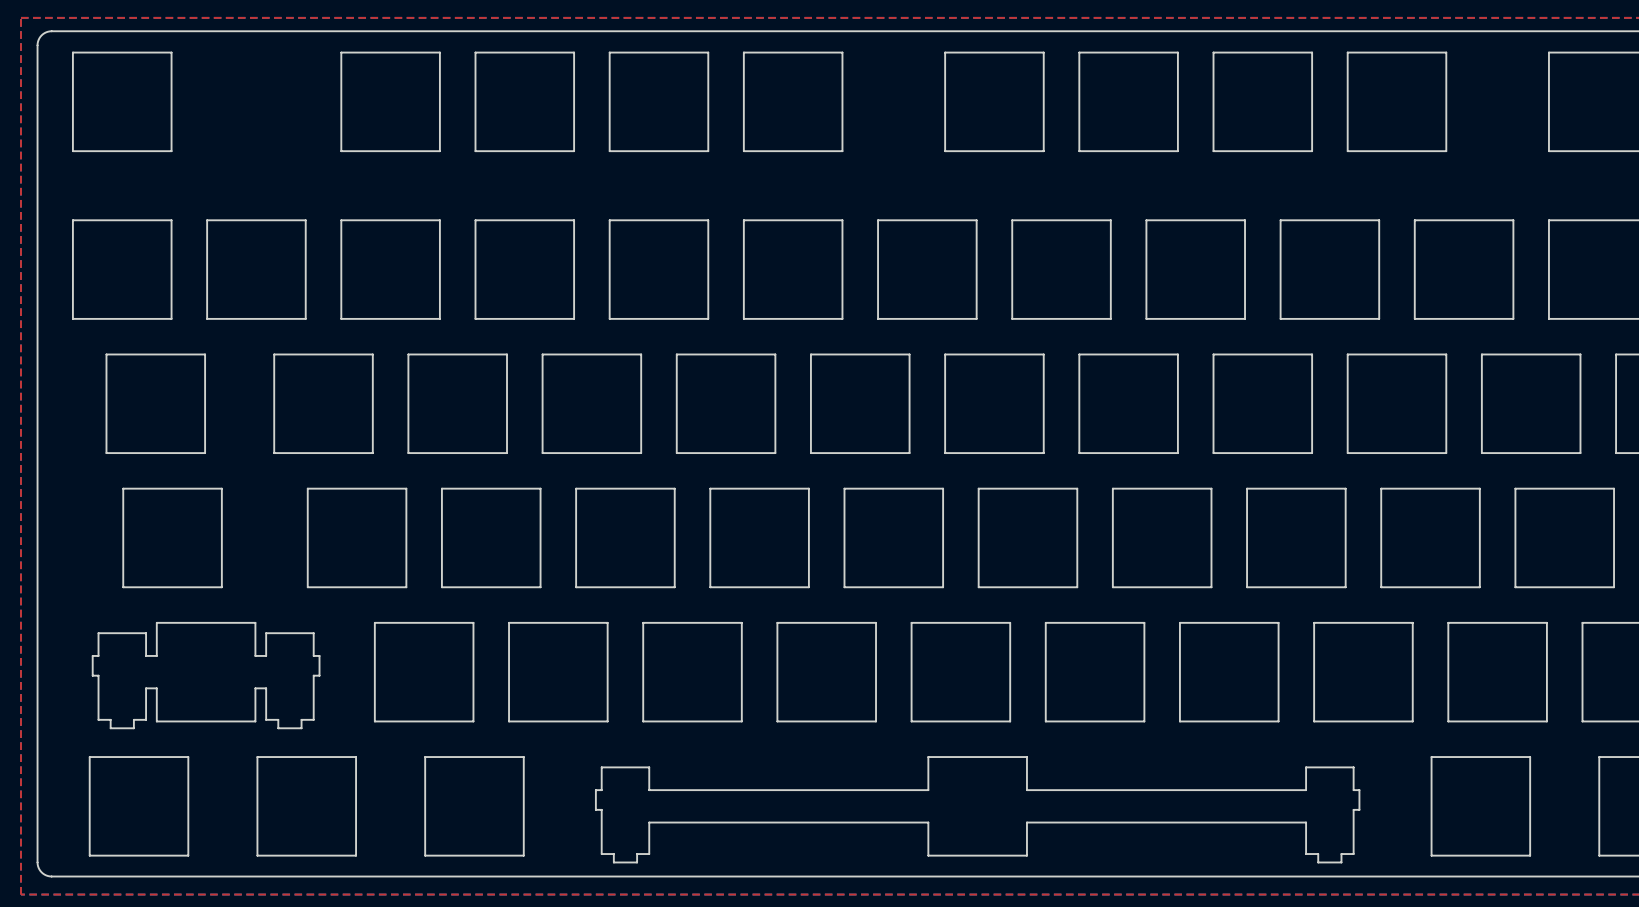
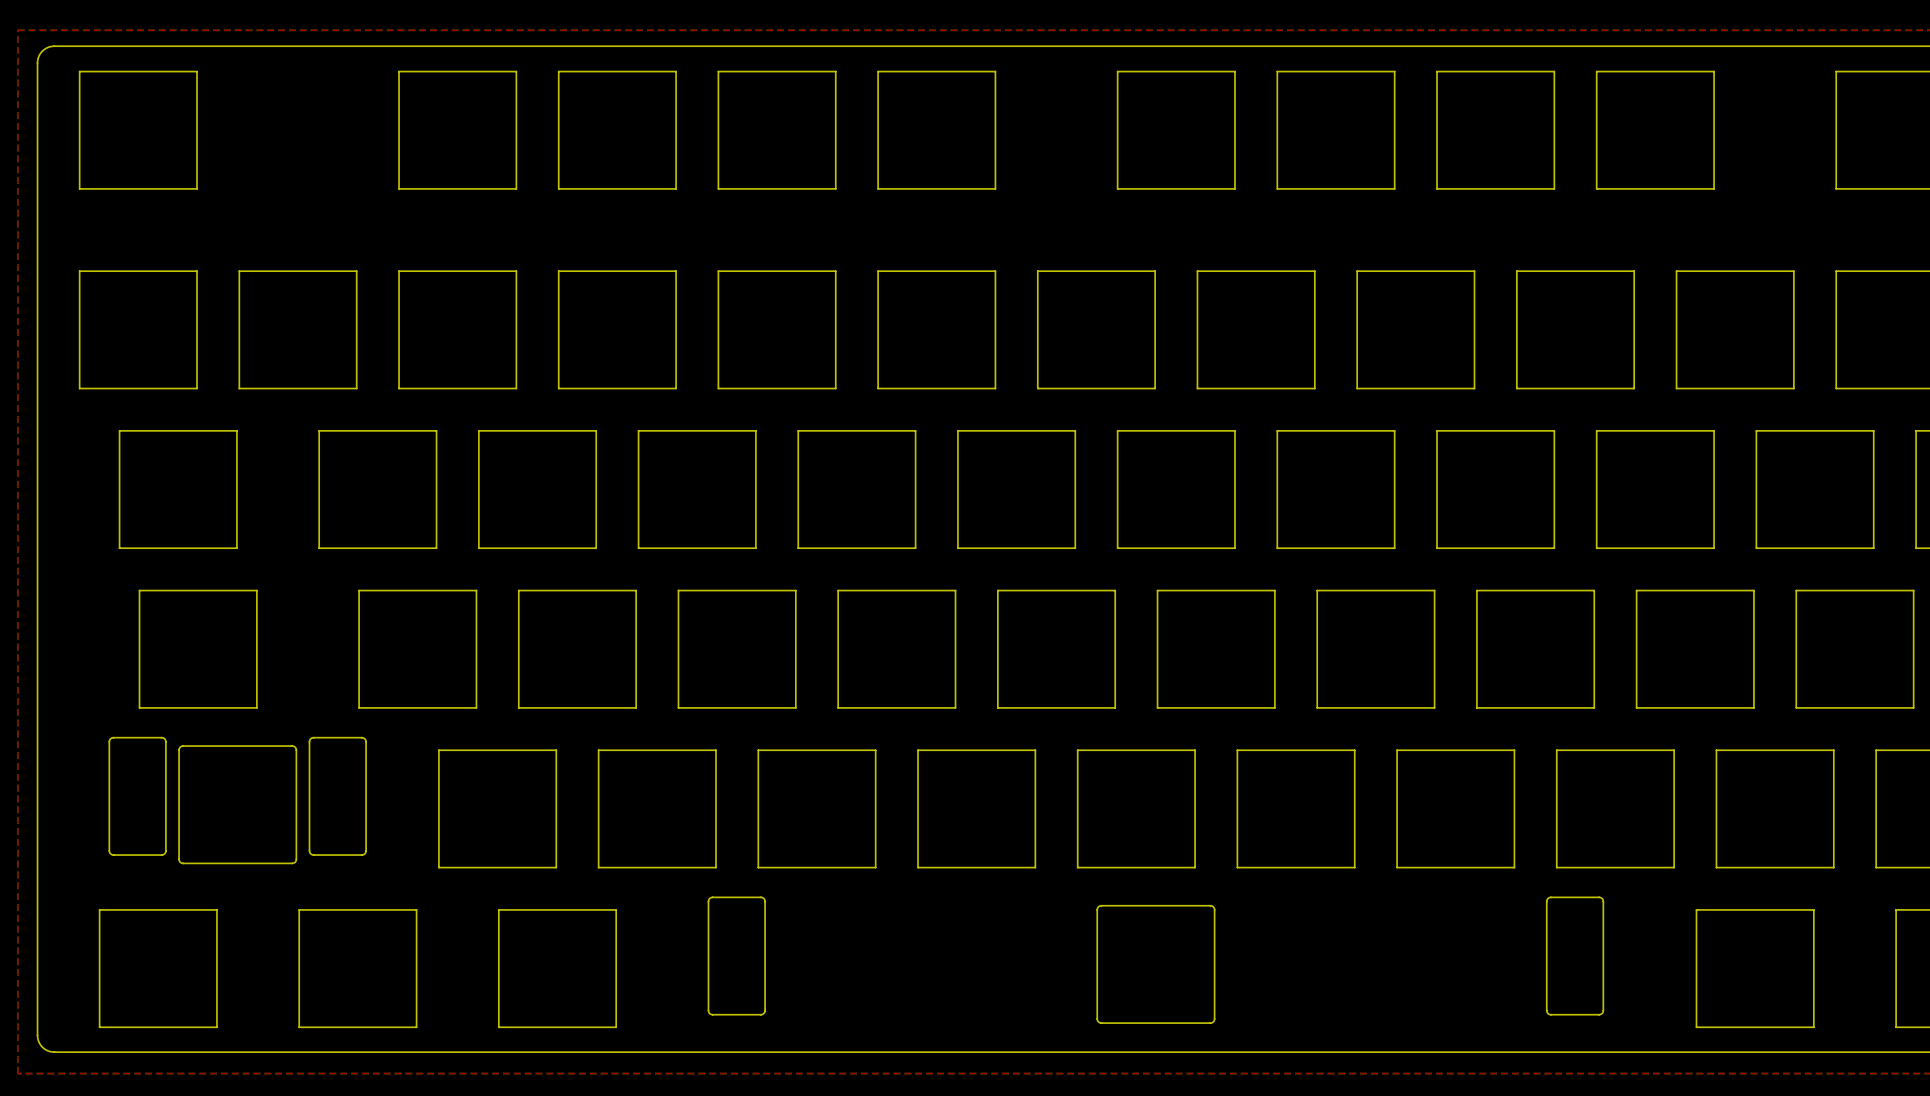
board edge: none -> (113, 737) (161, 737) (165, 740) (165, 850) (163, 854) (113, 855) (109, 852) (109, 741) (113, 737)
board edge: none -> (313, 737) (361, 737) (365, 740) (366, 850) (363, 854) (313, 855) (309, 852) (309, 741) (313, 737)
board edge: none -> (183, 746) (295, 747) (295, 862) (180, 862) (179, 750) (183, 746)
board edge: (156, 622) (255, 622) (255, 655) (266, 655) (266, 633) (313, 633) (313, 655) (319, 655) (319, 675) (313, 675) (313, 719) (301, 719) (301, 728) (278, 728) (278, 719) (266, 719) (266, 688) (255, 688) (255, 721) (156, 721) (156, 688) (146, 688) (146, 719) (133, 719) (133, 728) (110, 728) (110, 719) (98, 719) (98, 675) (92, 675) (92, 655) (98, 655) (98, 633) (146, 633) (146, 655) (156, 655) (156, 622) -> none
board edge: none -> (712, 897) (760, 897) (764, 899) (765, 1010) (762, 1014) (712, 1014) (708, 1012) (708, 901) (712, 897)
board edge: none -> (1550, 897) (1599, 897) (1603, 899) (1603, 1010) (1600, 1014) (1550, 1014) (1547, 1012) (1546, 901) (1550, 897)
board edge: none -> (1101, 905) (1213, 906) (1213, 1021) (1098, 1021) (1097, 909) (1101, 905)
board edge: (928, 757) (1026, 757) (1026, 790) (1306, 790) (1306, 767) (1353, 767) (1353, 790) (1359, 790) (1359, 809) (1353, 809) (1353, 854) (1341, 854) (1341, 862) (1318, 862) (1318, 854) (1306, 854) (1306, 822) (1026, 822) (1026, 855) (928, 855) (928, 822) (649, 822) (649, 854) (637, 854) (637, 862) (613, 862) (613, 854) (601, 854) (601, 809) (595, 809) (595, 790) (601, 790) (601, 767) (649, 767) (649, 790) (928, 790) (928, 757) -> none

